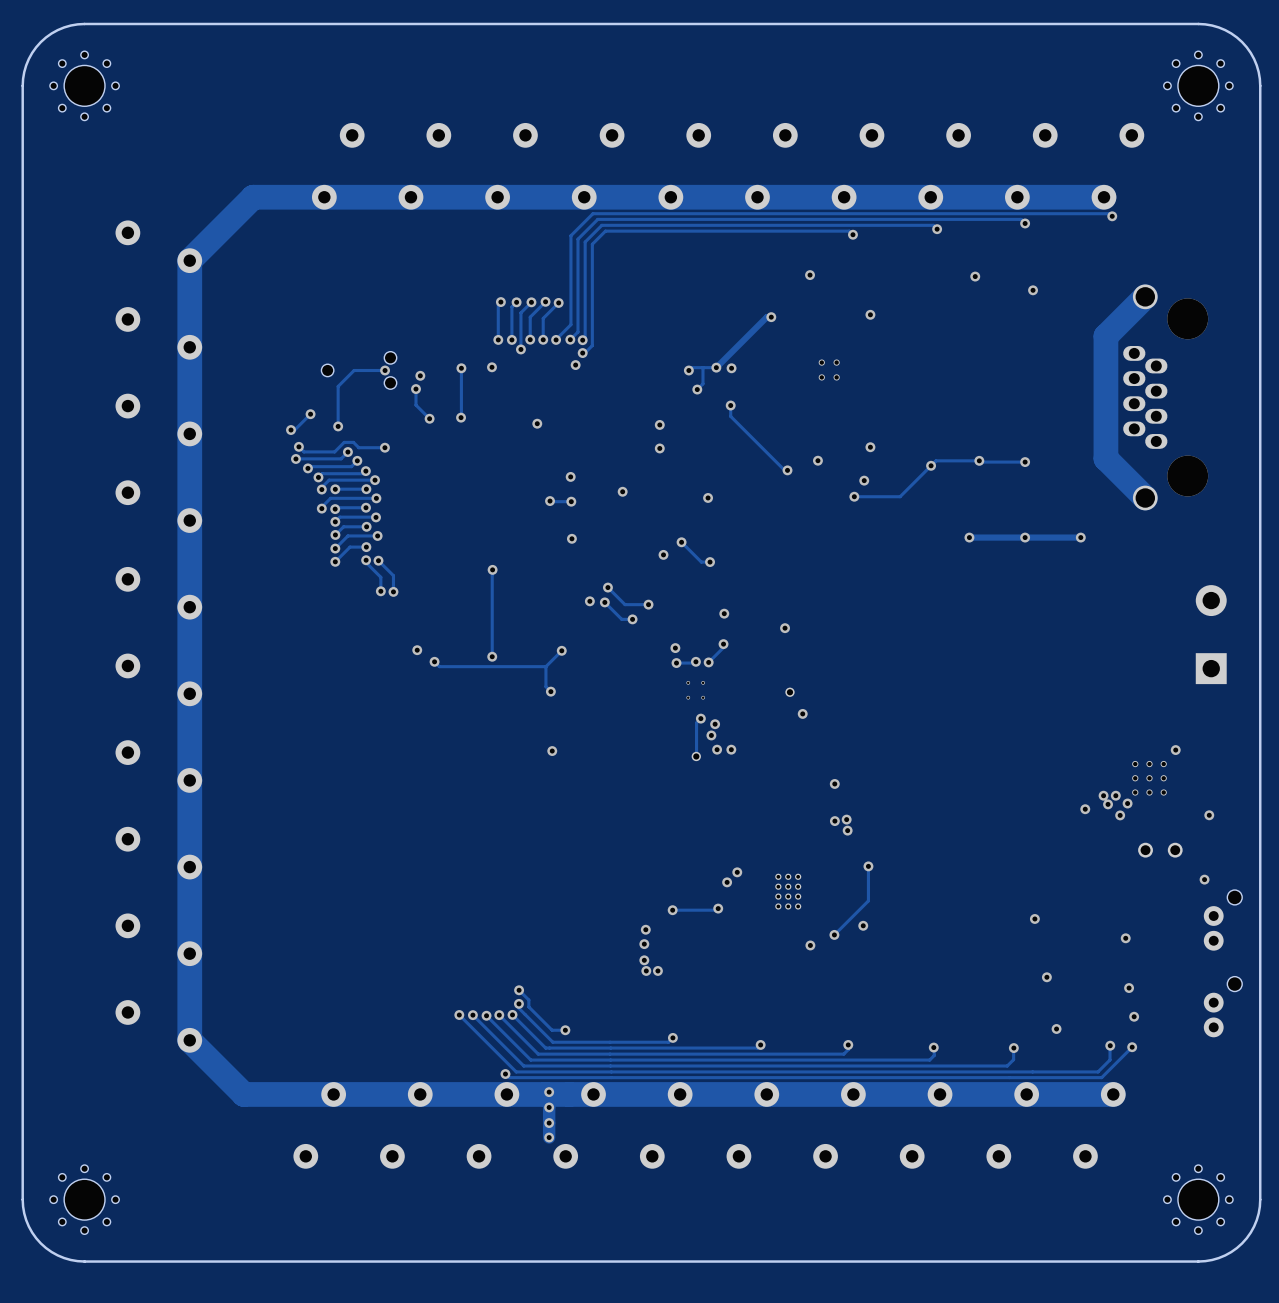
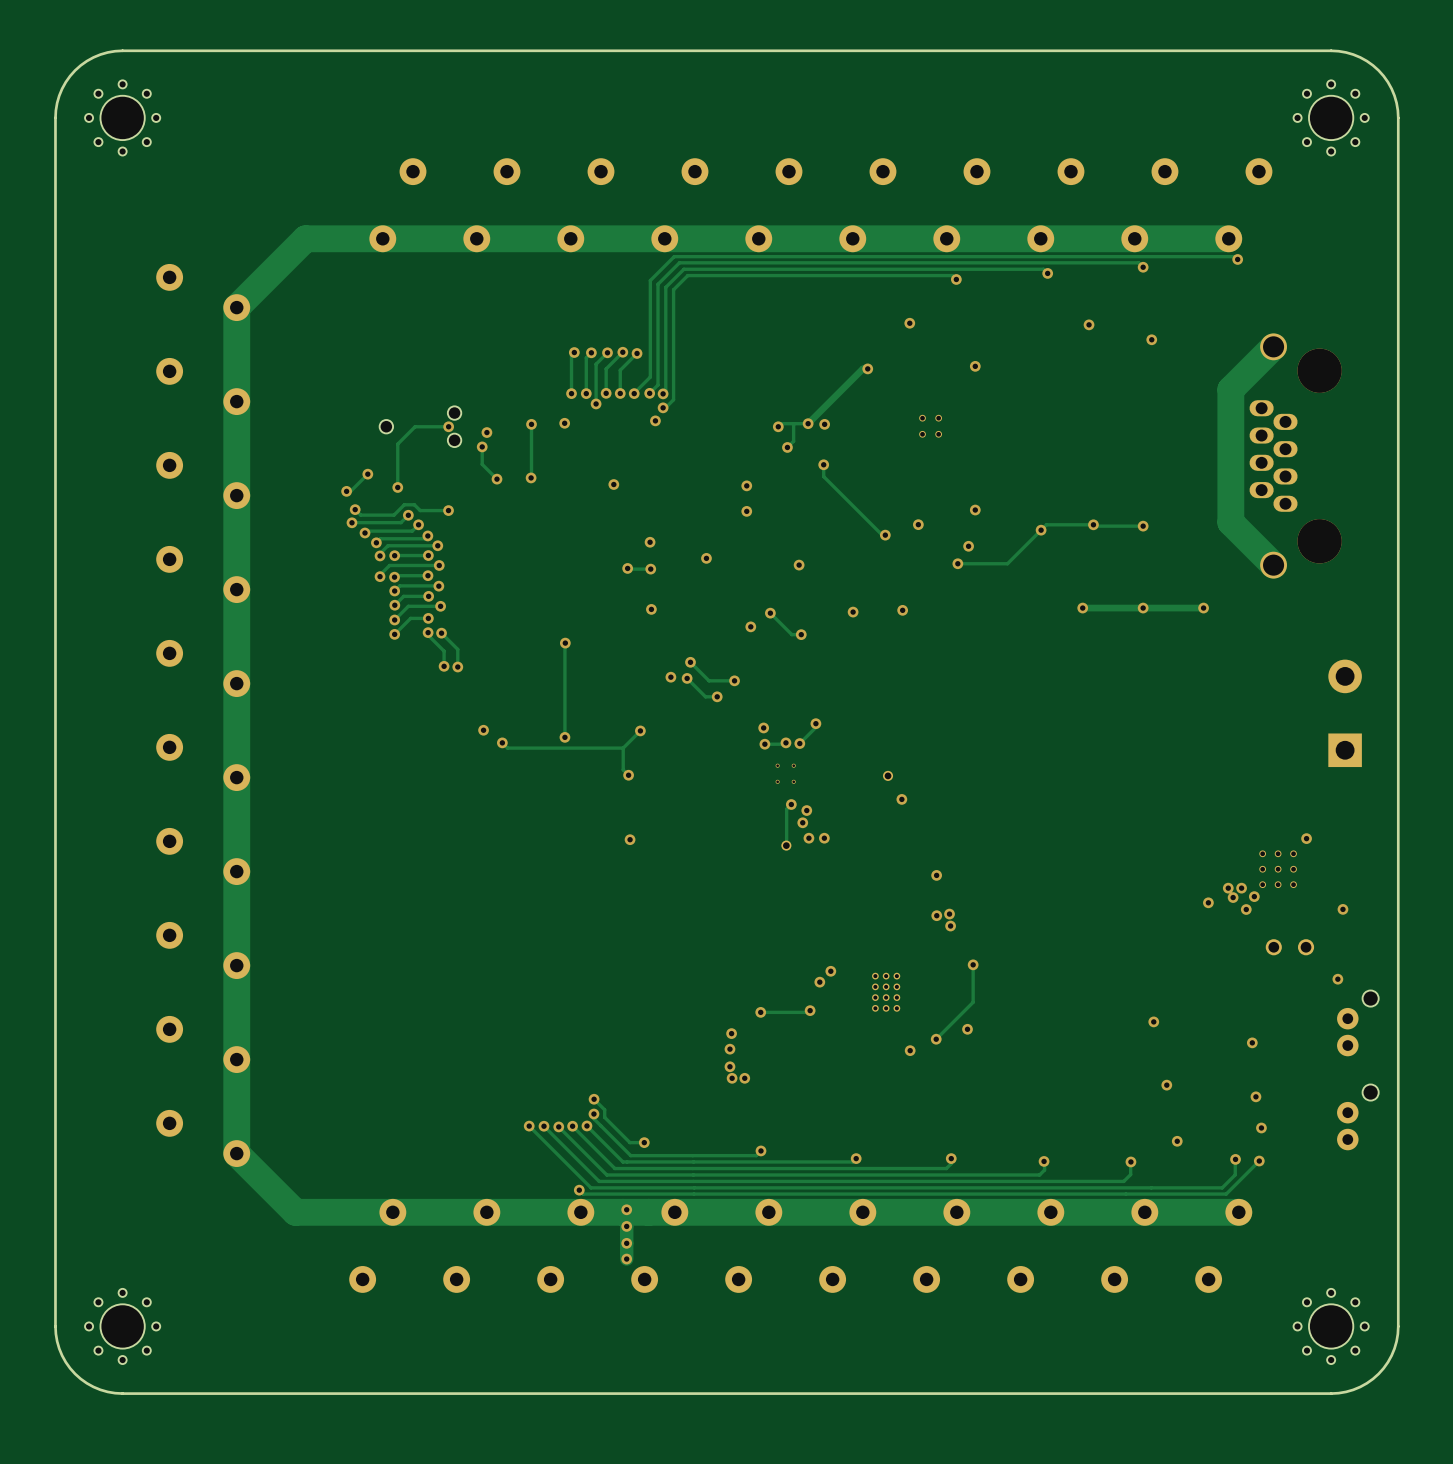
via: none -> (902, 610)
via: none -> (853, 612)
via: (724, 613) -> none
via: (785, 628) -> none

